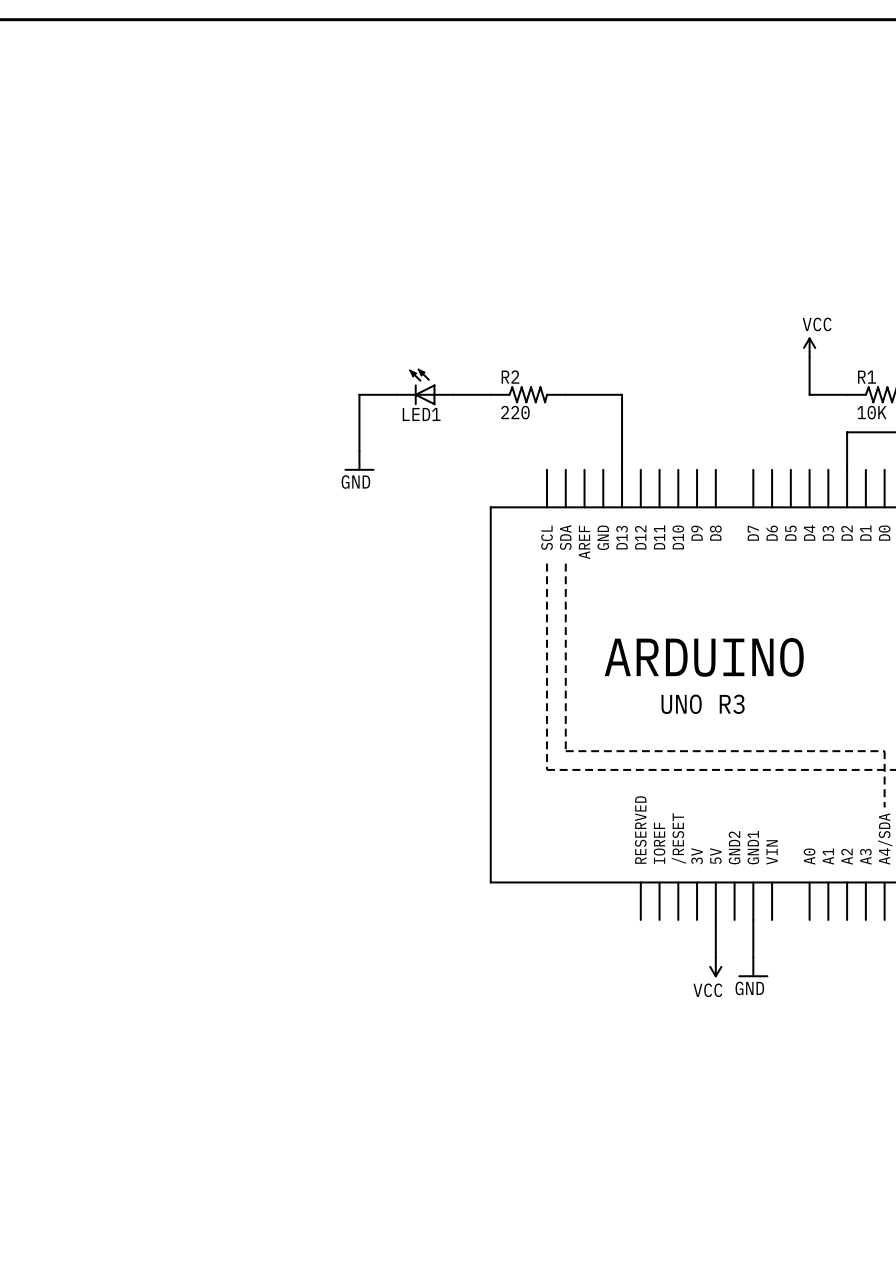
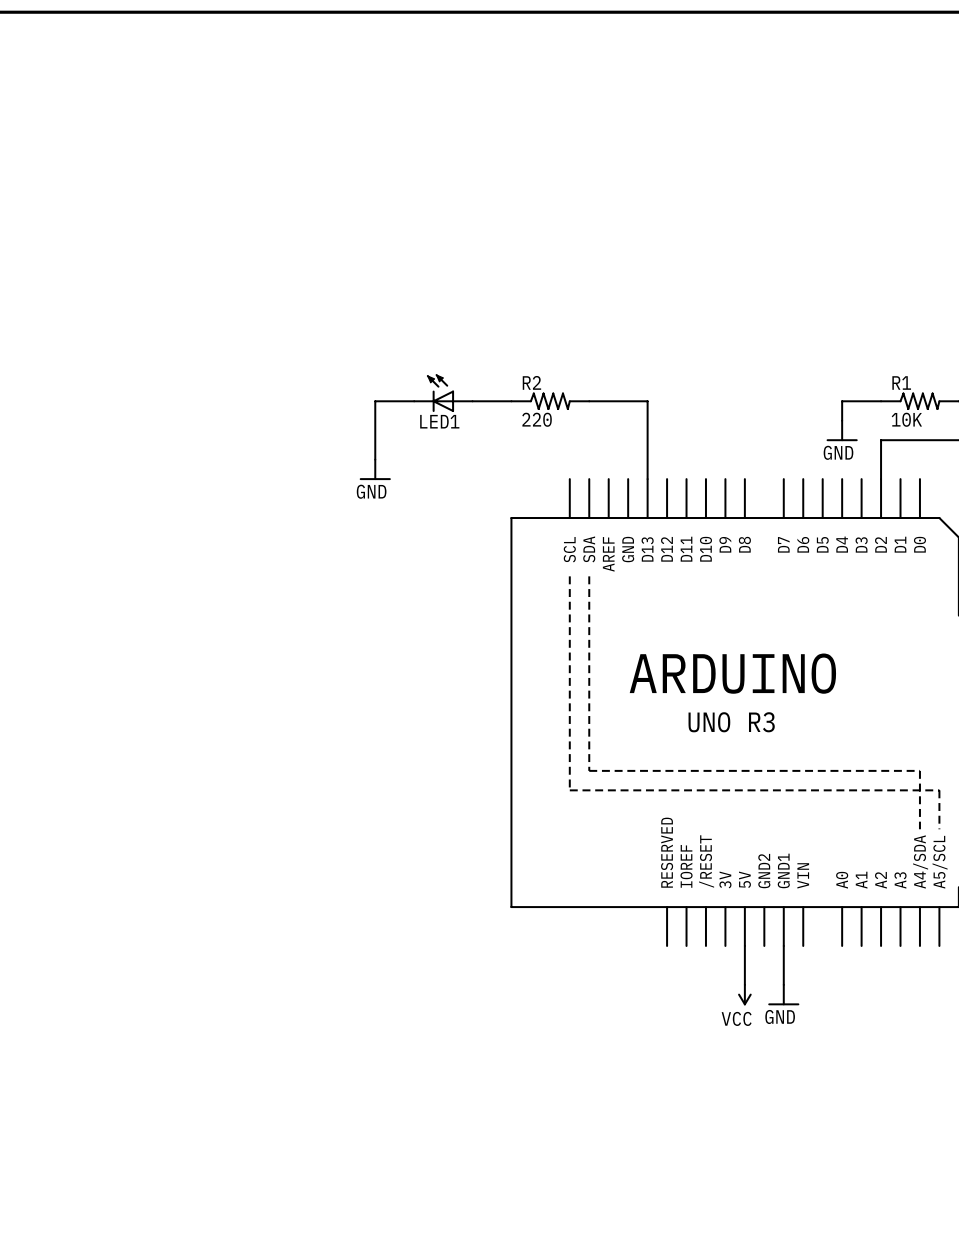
power symbol: VCC (809, 347) -> none
wire: (809, 357) (809, 394) -> (842, 420) (842, 401)
power symbol: none -> GND (842, 430)

